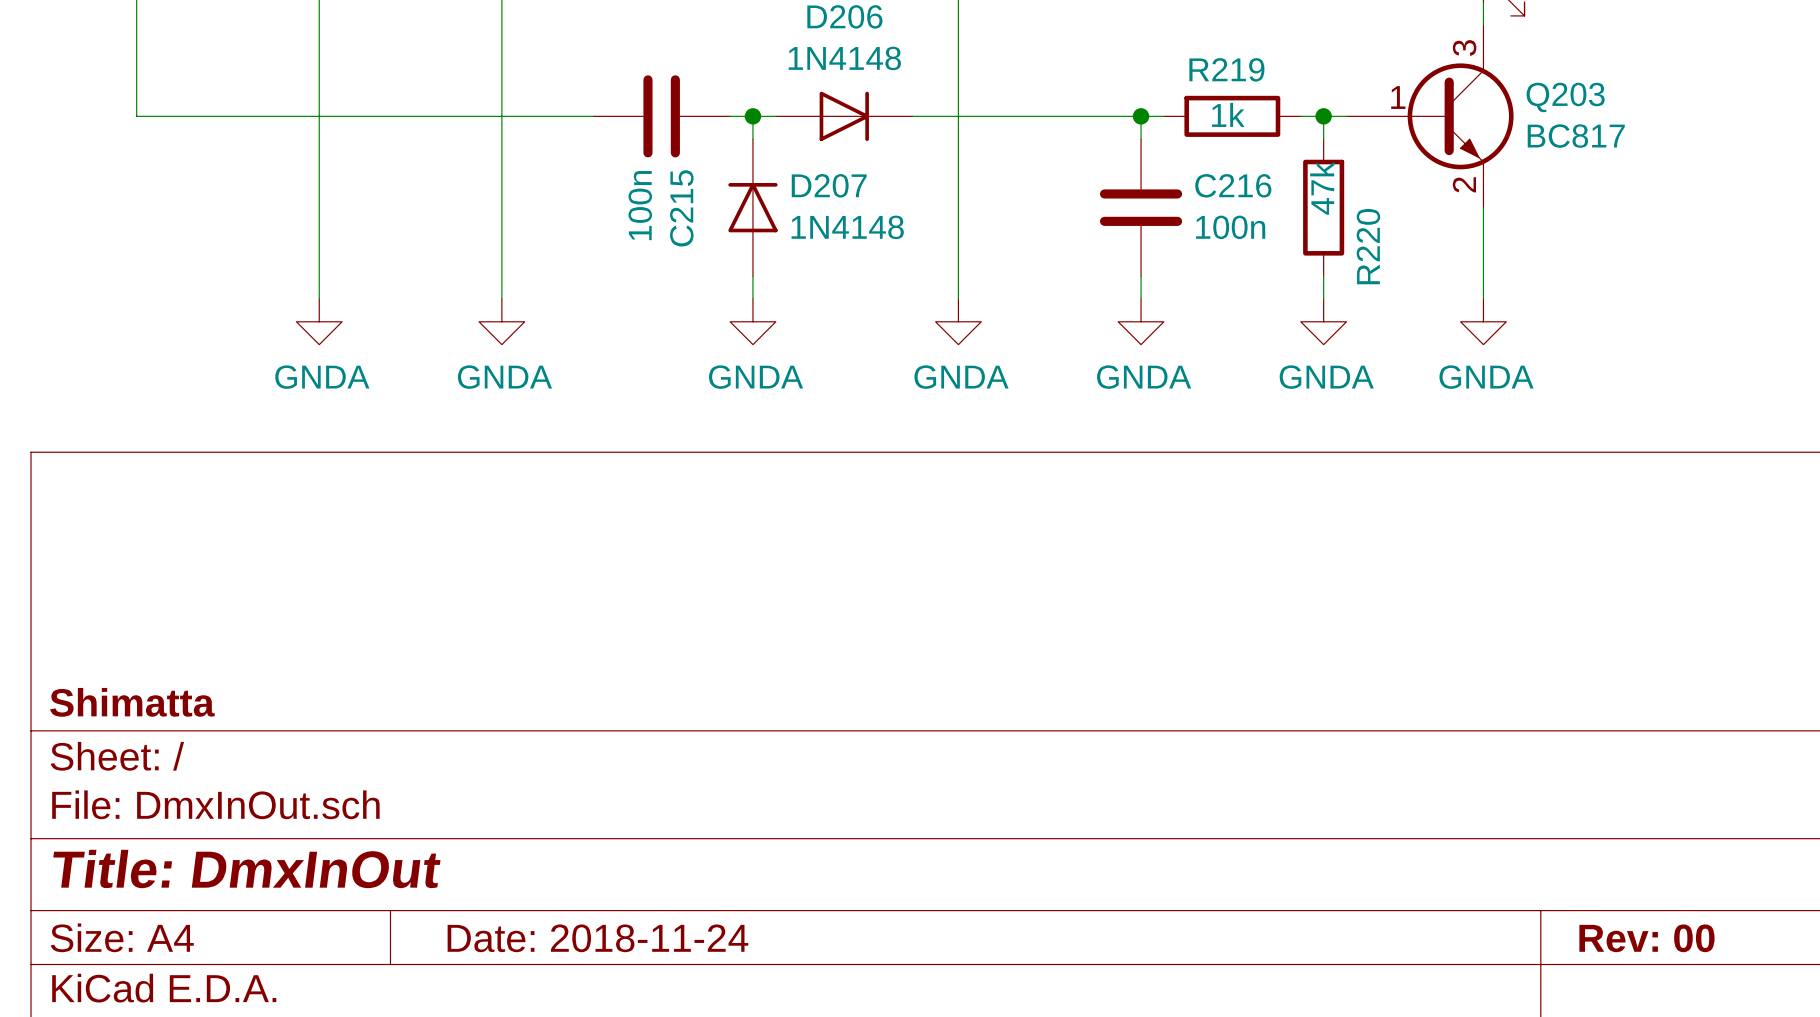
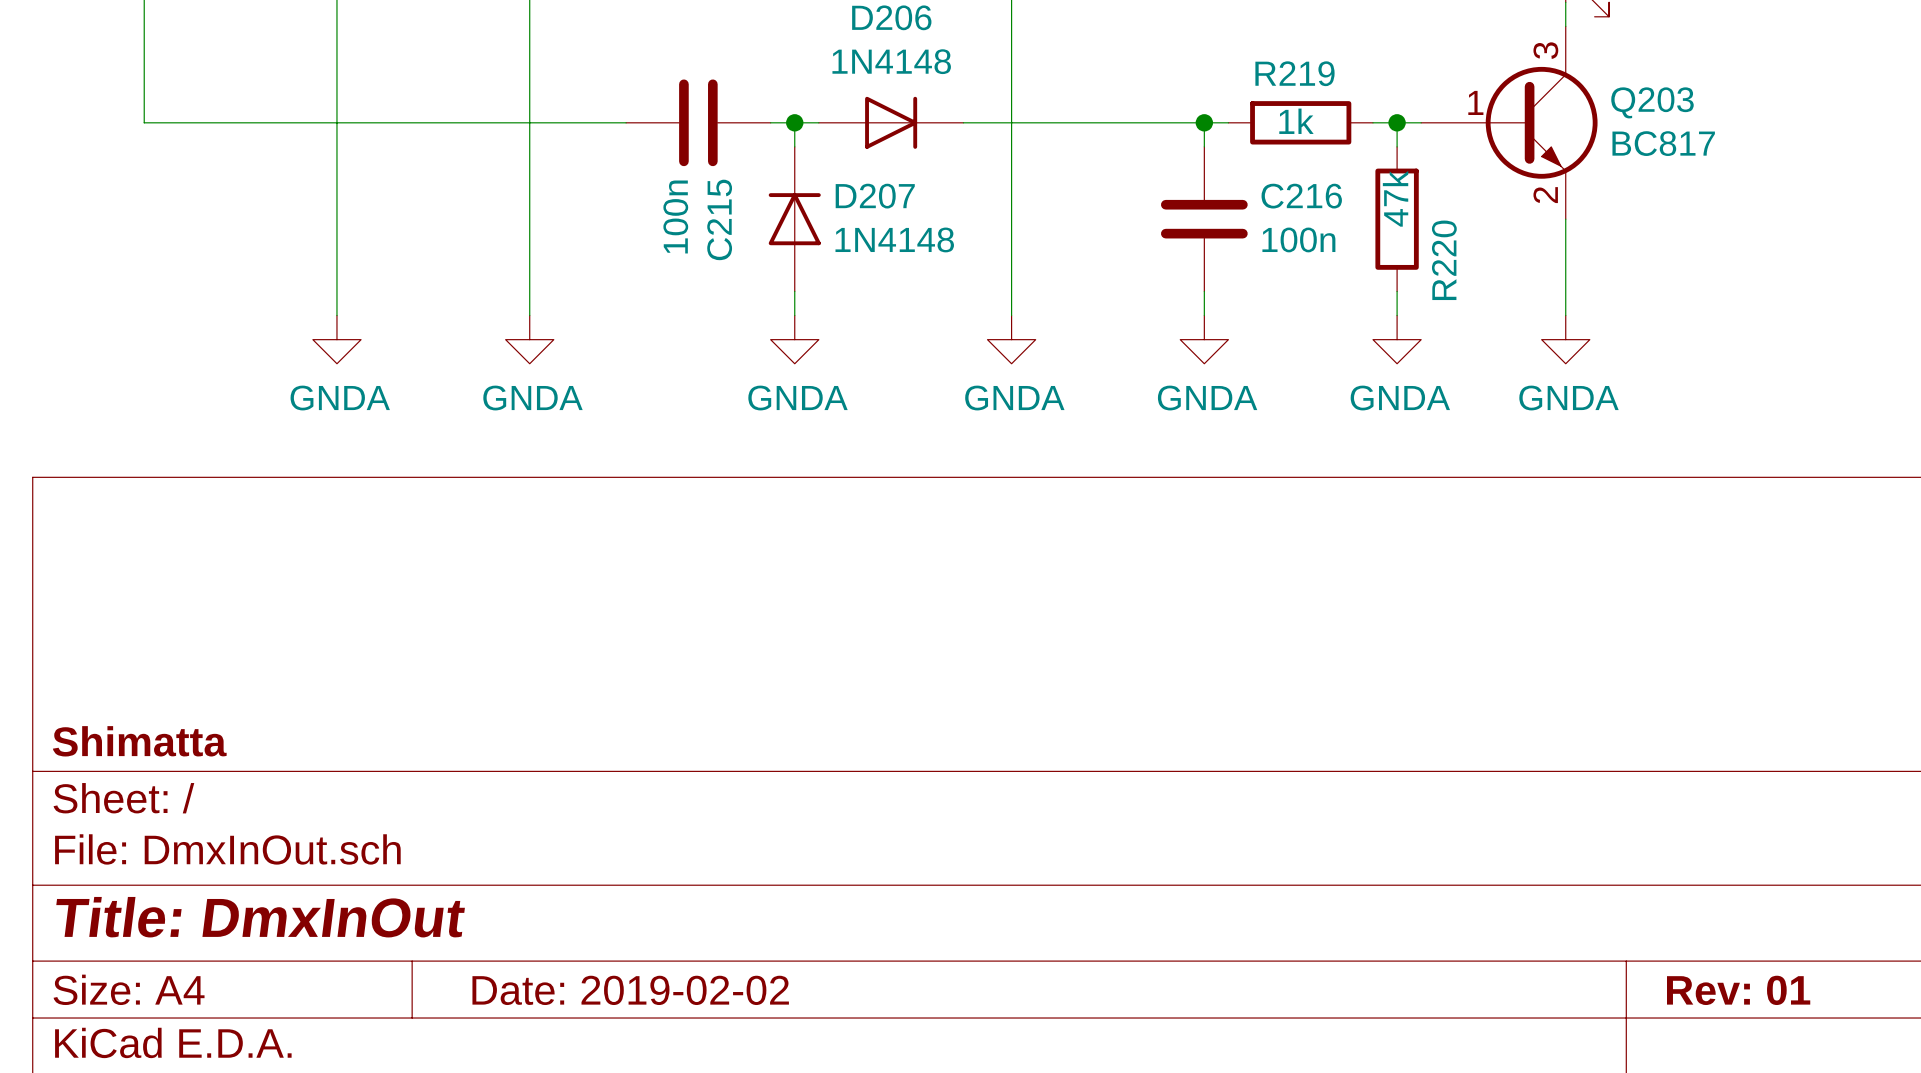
title block: Date: 2018-11-24 (597, 938) -> Date: 2019-02-02 (630, 990)
title block: Rev: 00 (1646, 938) -> Rev: 01 (1738, 990)

